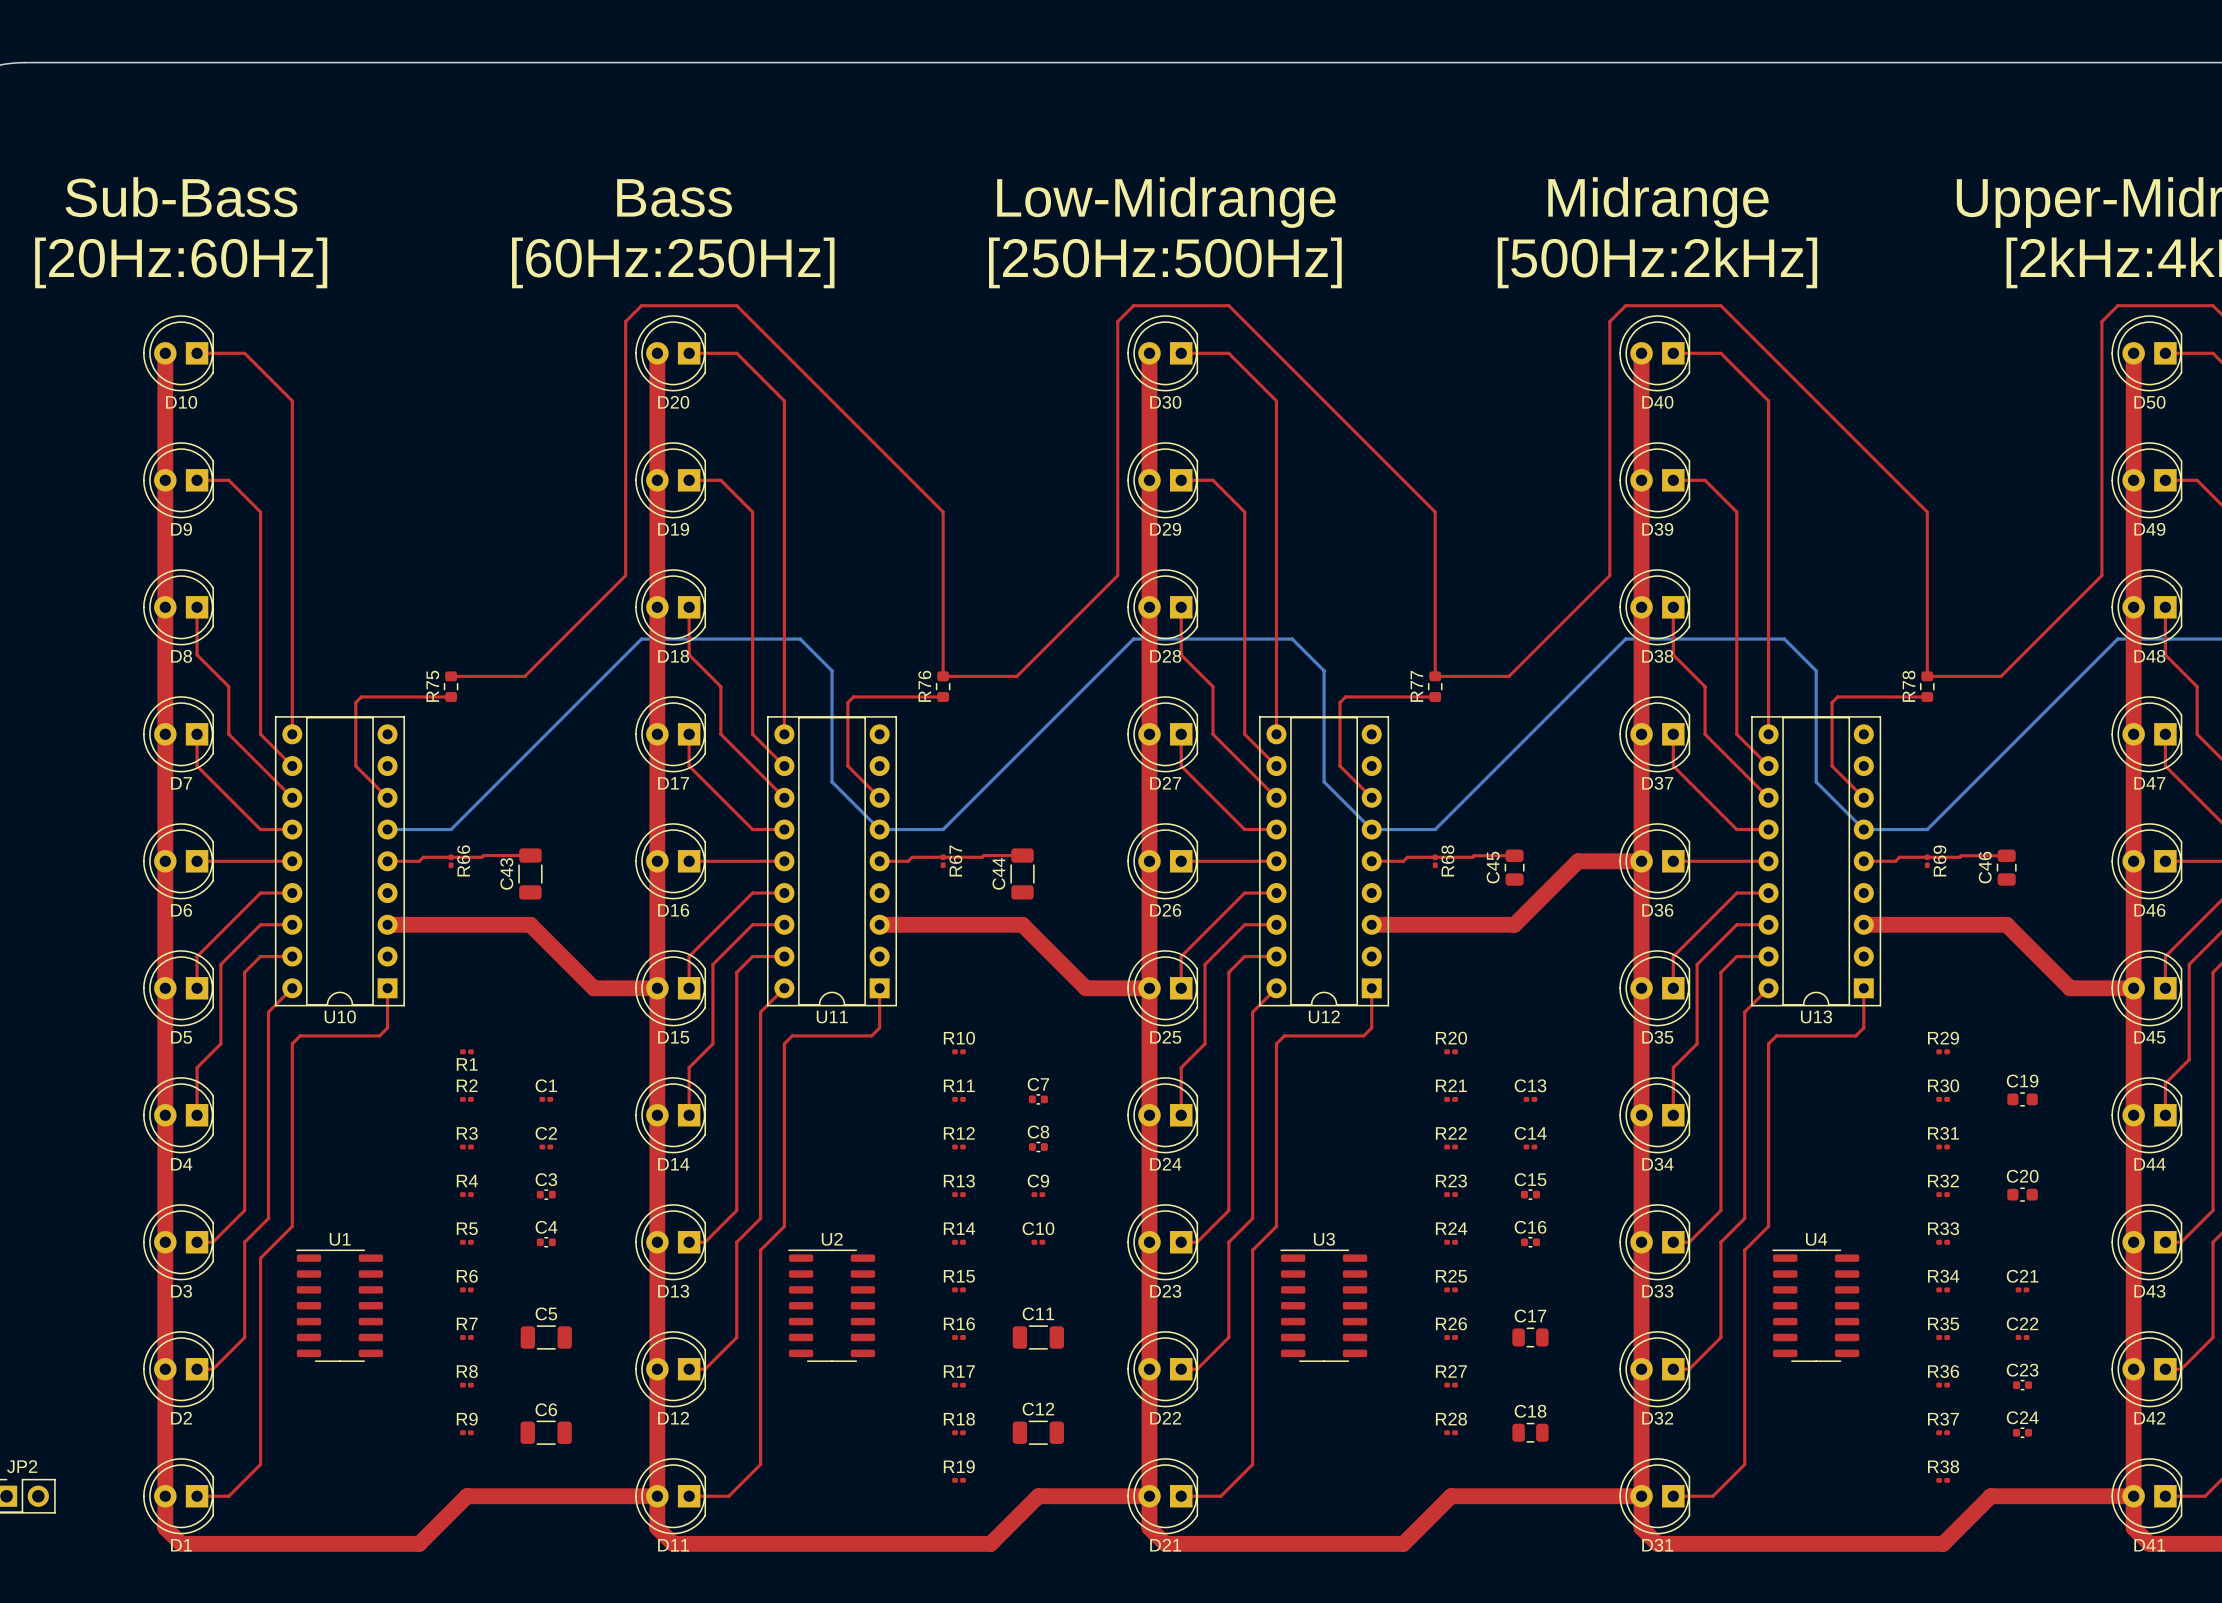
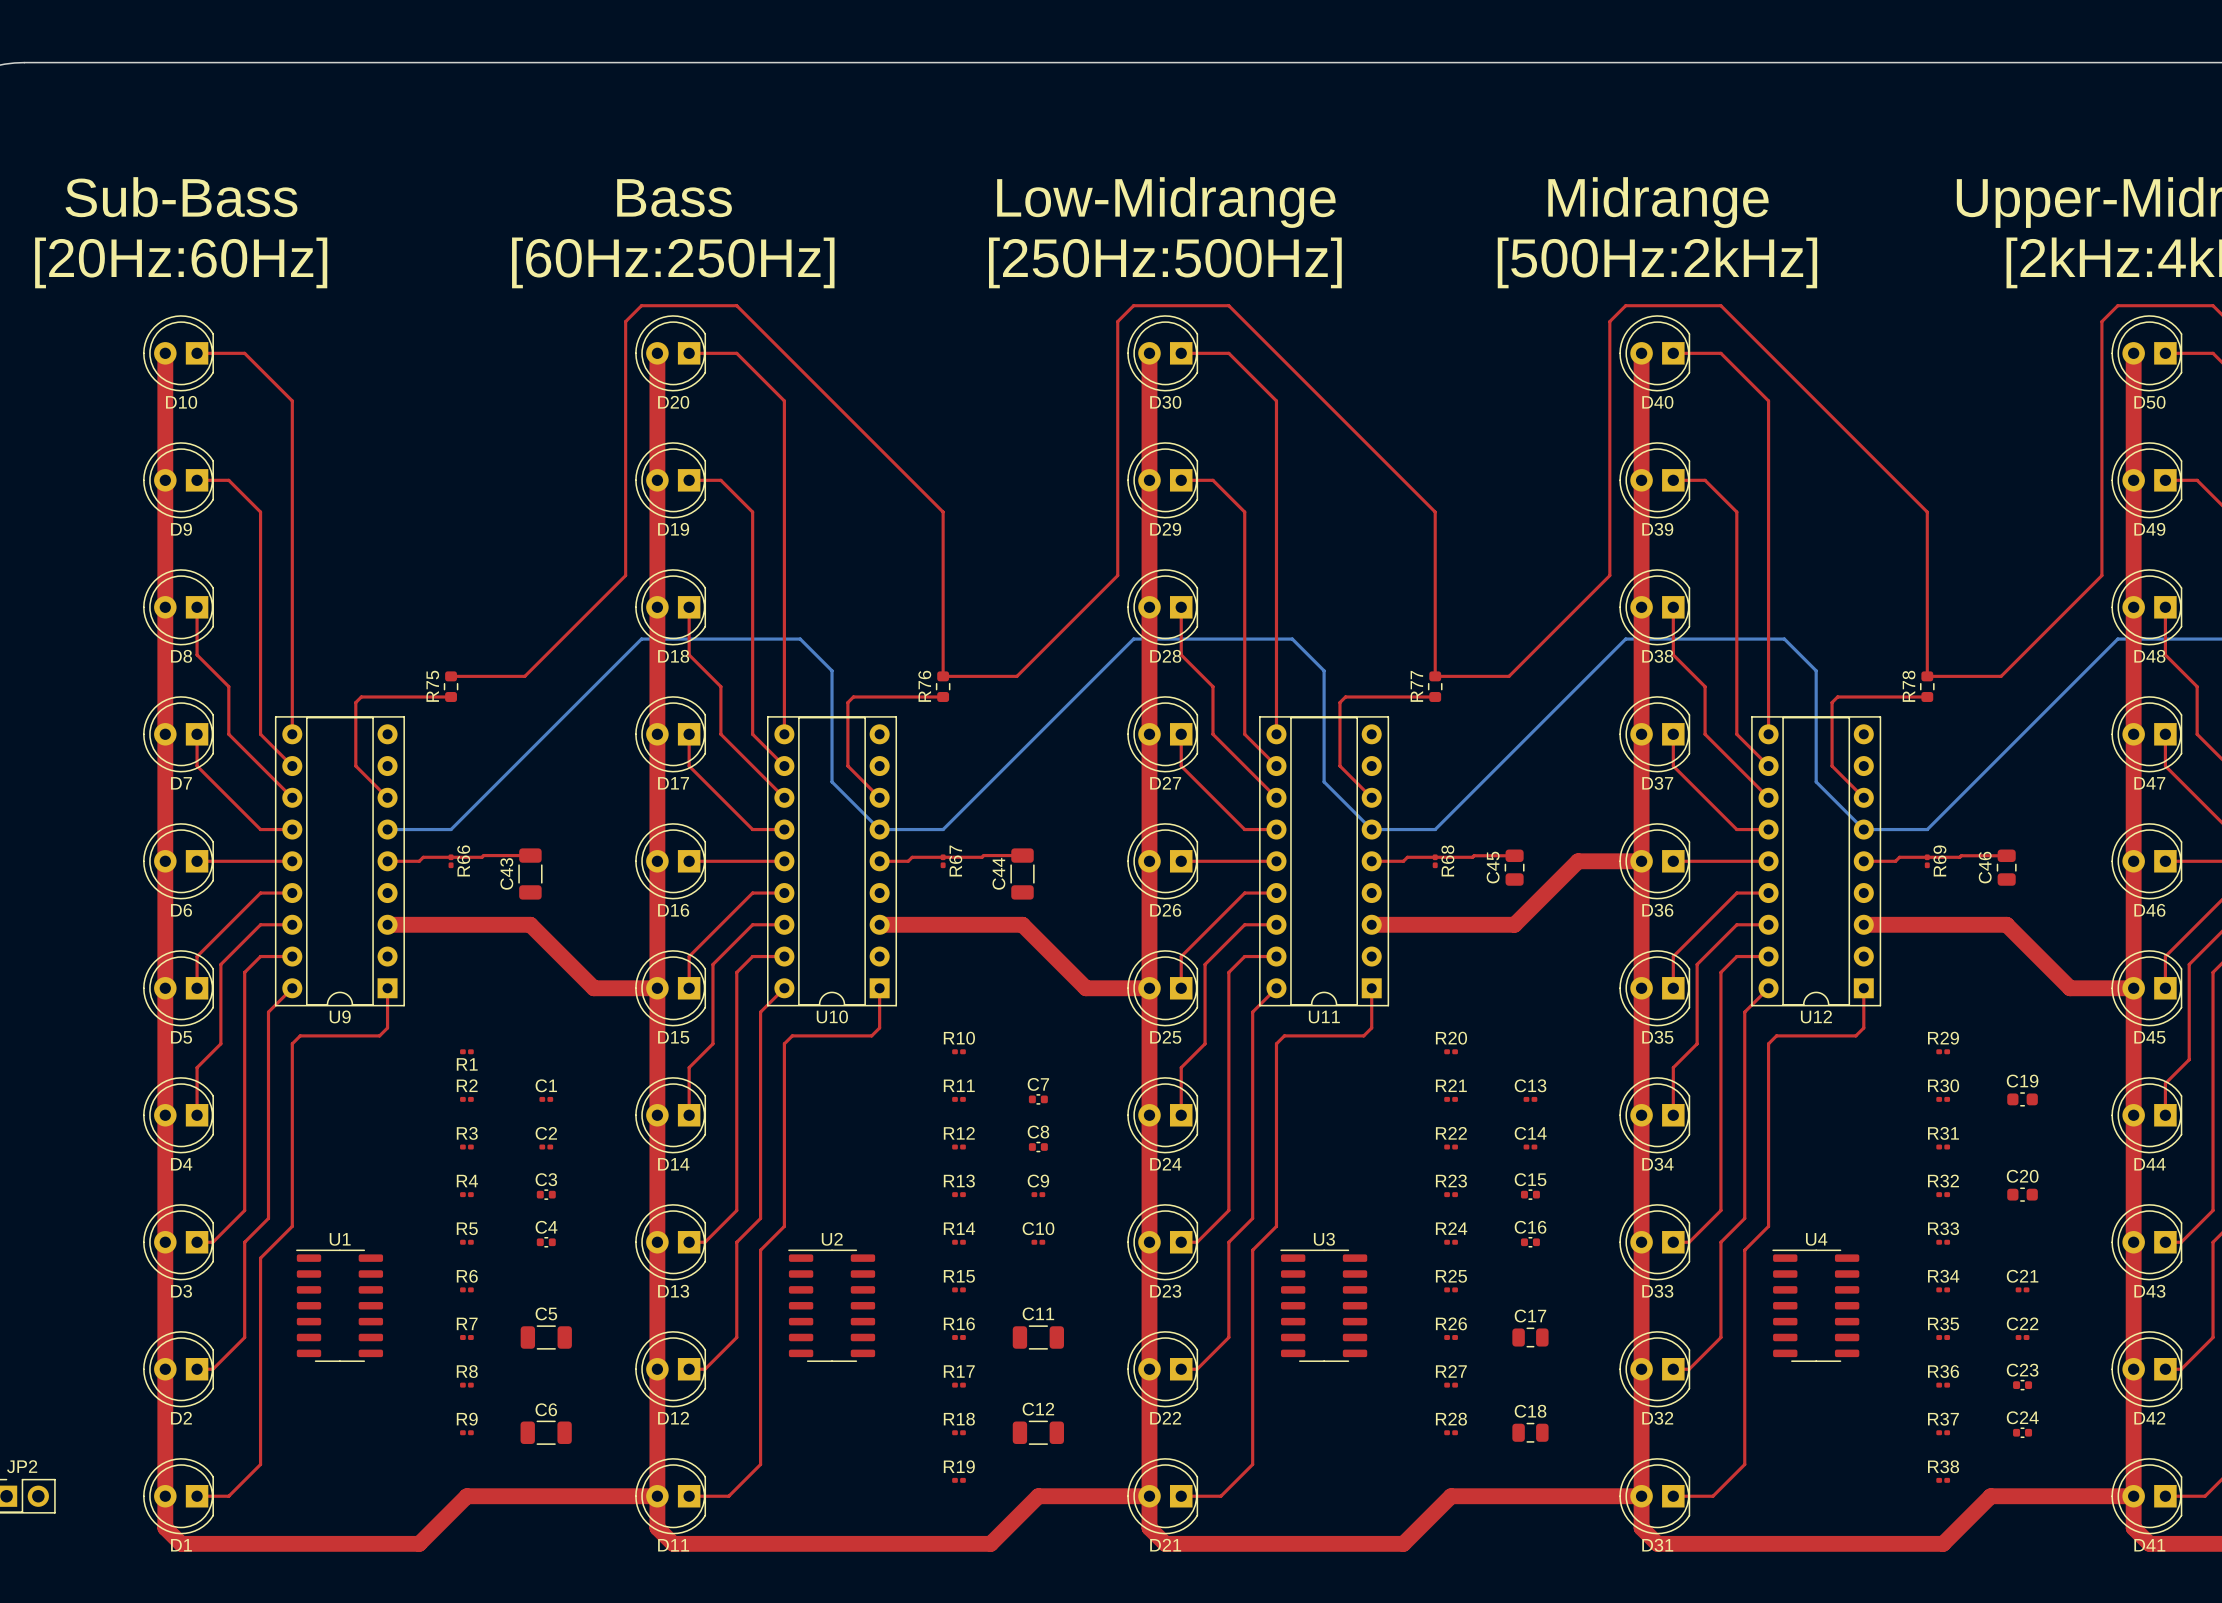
U10 name: U10 (340, 1016) -> U9 (340, 1016)
U12 name: U12 (1324, 1016) -> U11 (1324, 1017)
U13 name: U13 (1816, 1016) -> U12 (1816, 1016)
U11 name: U11 (832, 1017) -> U10 (832, 1016)

